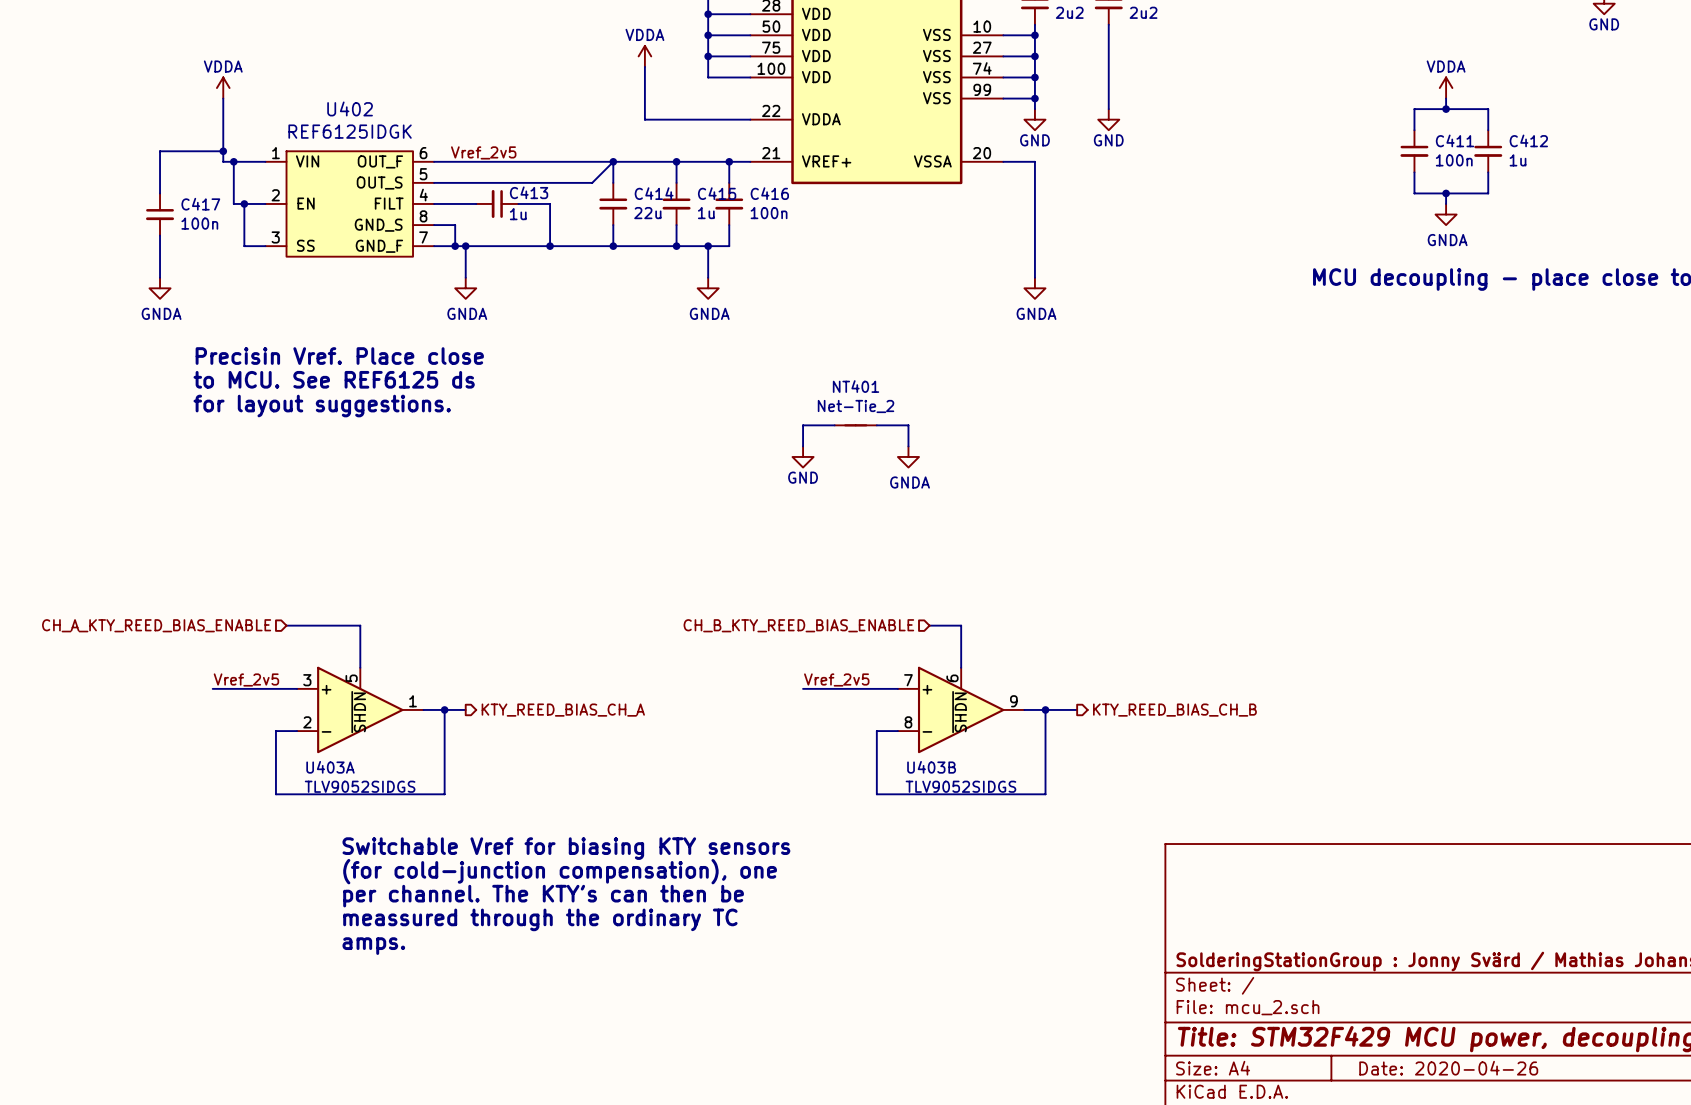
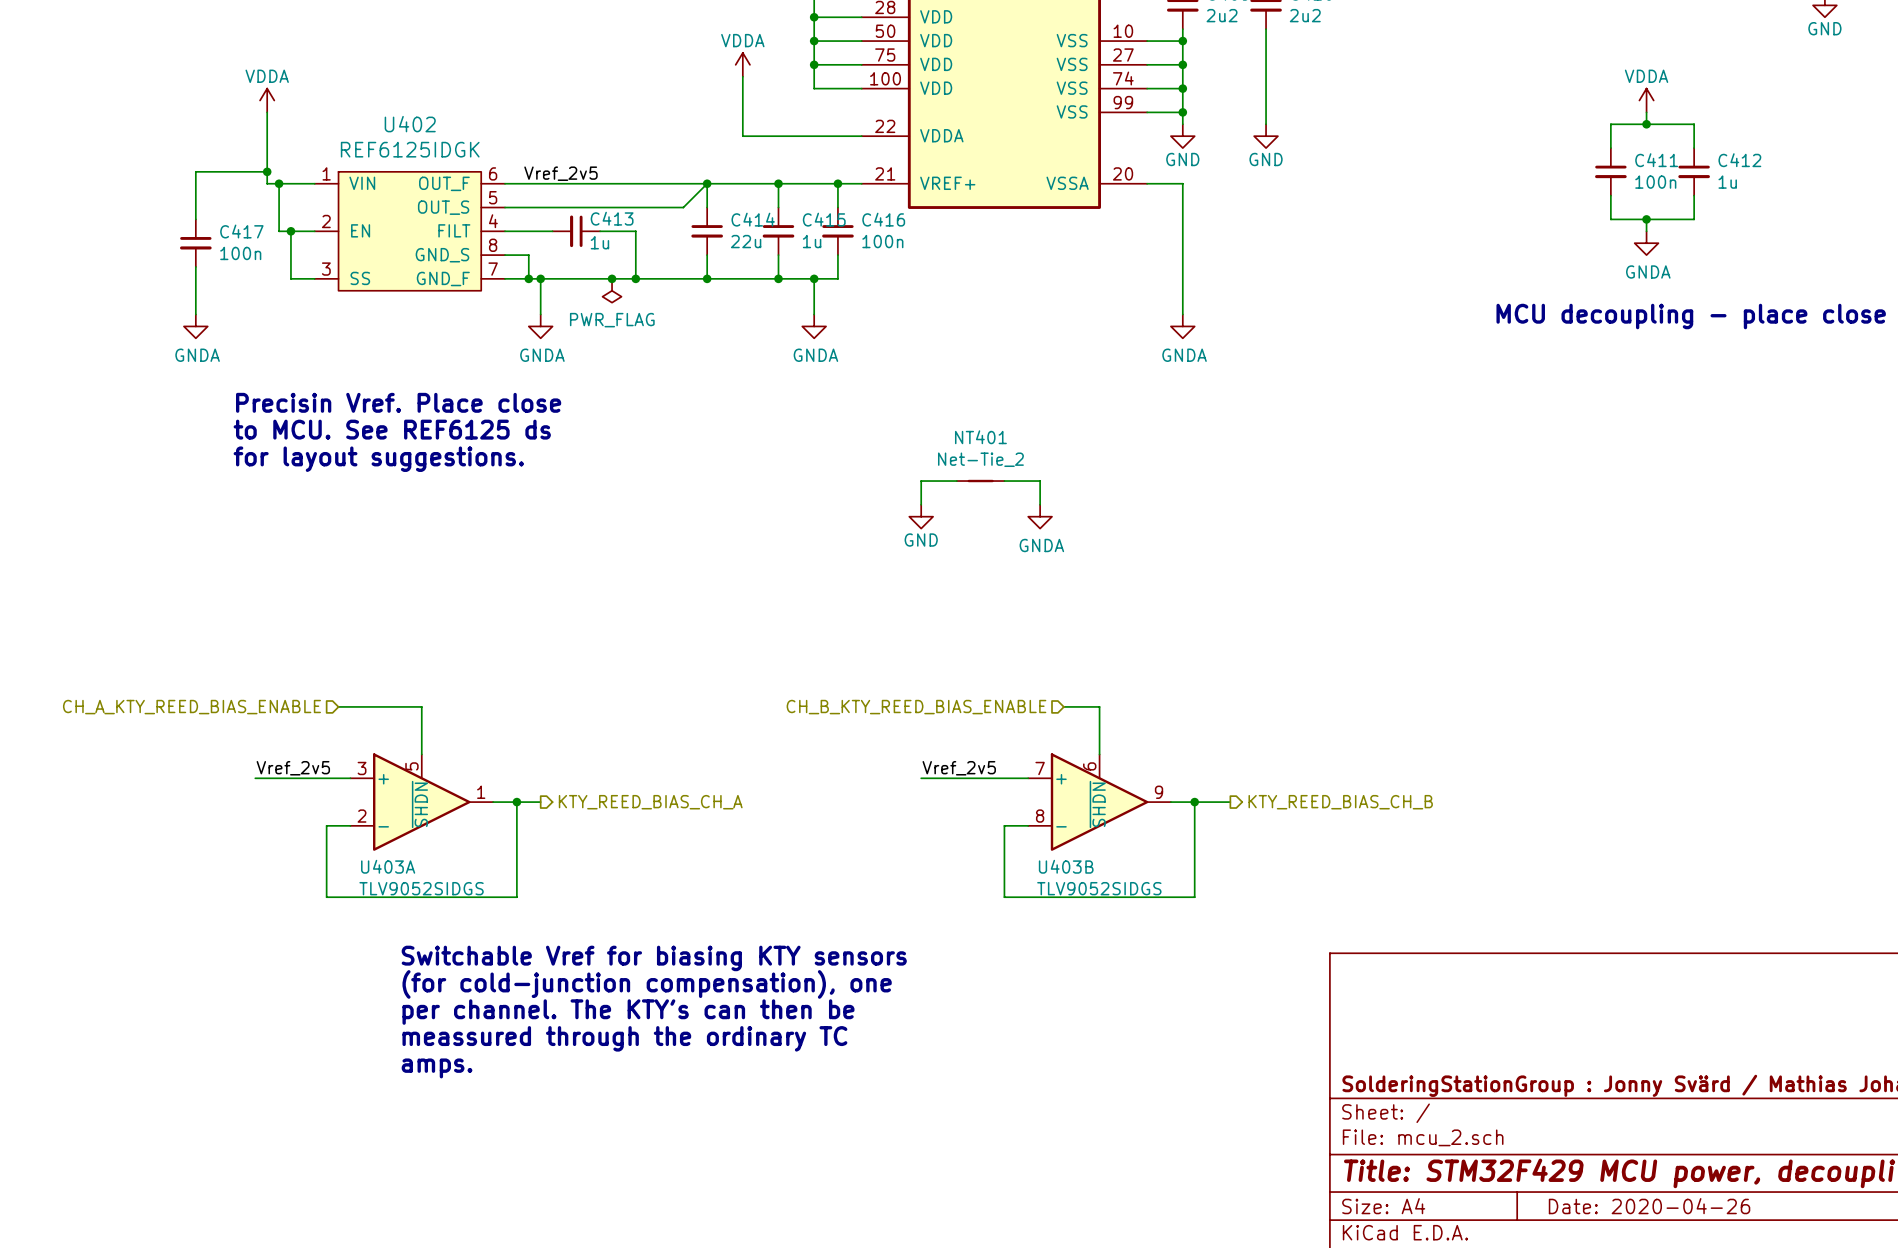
junction: none -> (612, 278)
power symbol: none -> PWR_FLAG (612, 290)

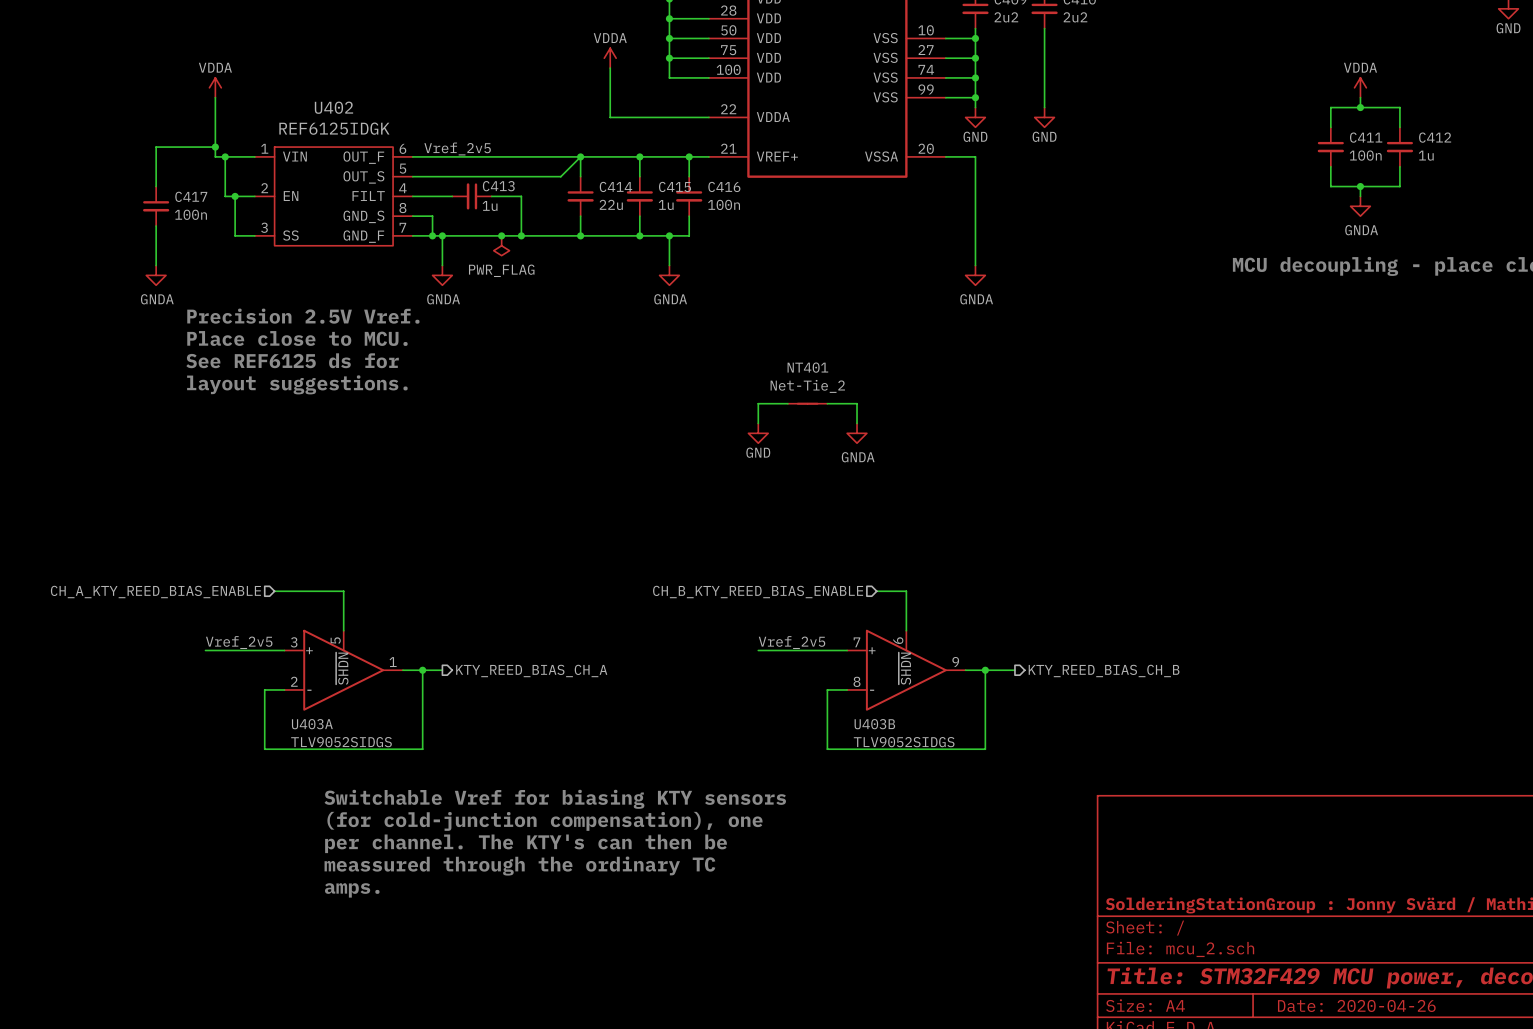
text: none -> Precision 2.5V Vref. (303, 316)
text: Precisin Vref. Place close (398, 402) -> Place close to MCU. (297, 338)
text: to MCU. See REF6125 ds (392, 429) -> See REF6125 ds for (292, 360)
text: for layout suggestions. (378, 459) -> layout suggestions. (297, 384)

